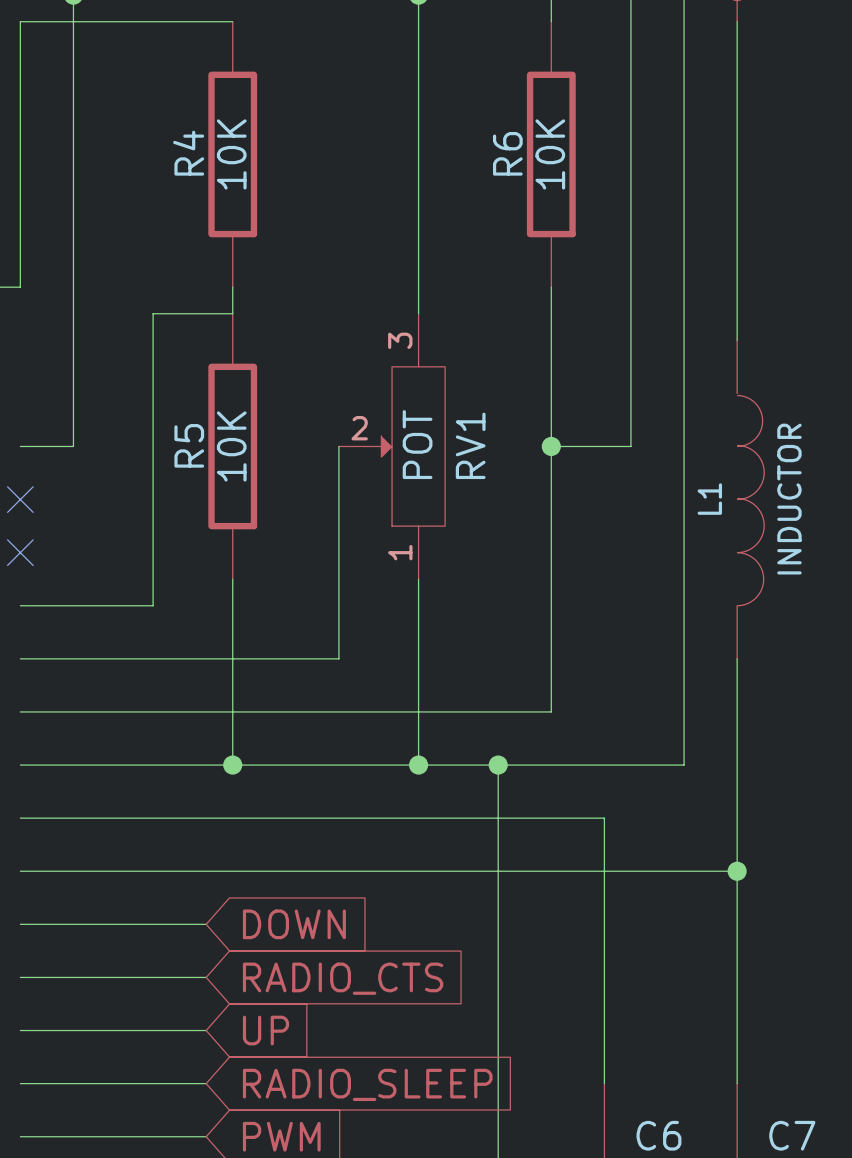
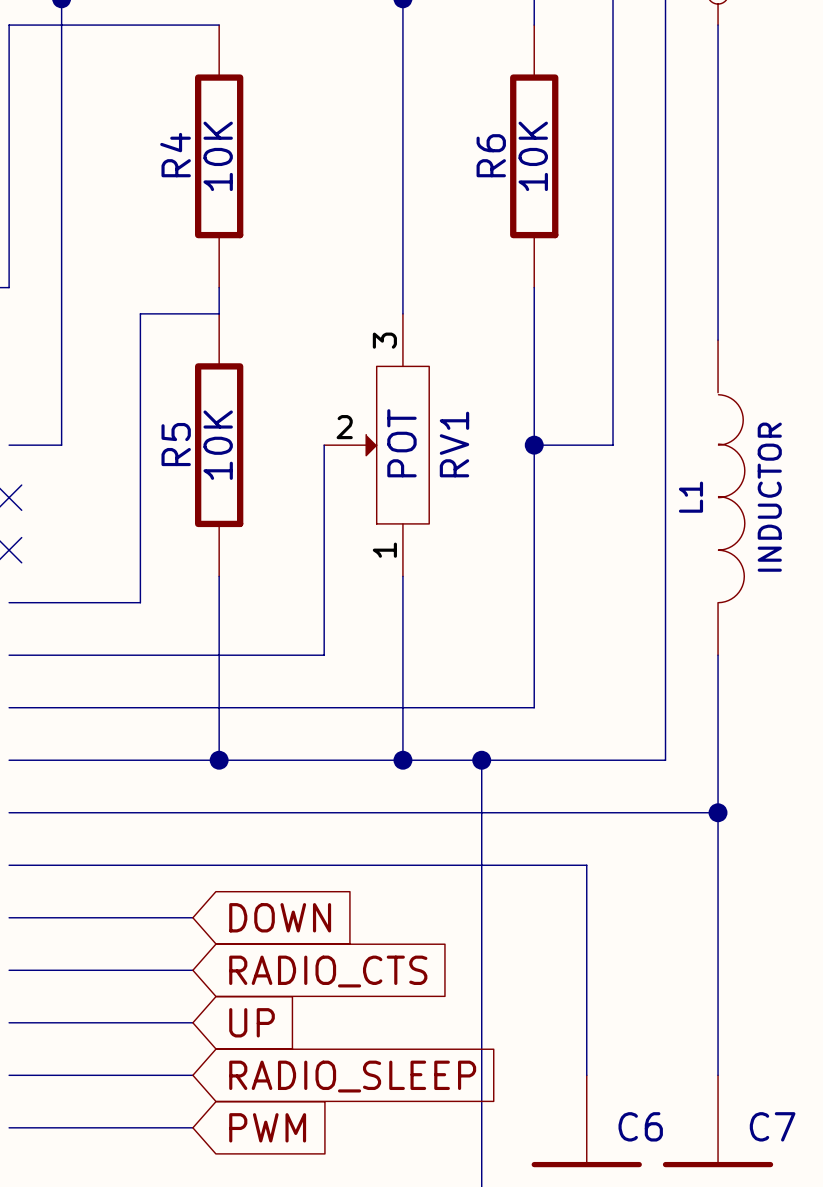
wire: (604, 818) (604, 871) (737, 871) -> (586, 812) (718, 812)
junction position: (737, 871) -> (718, 812)

